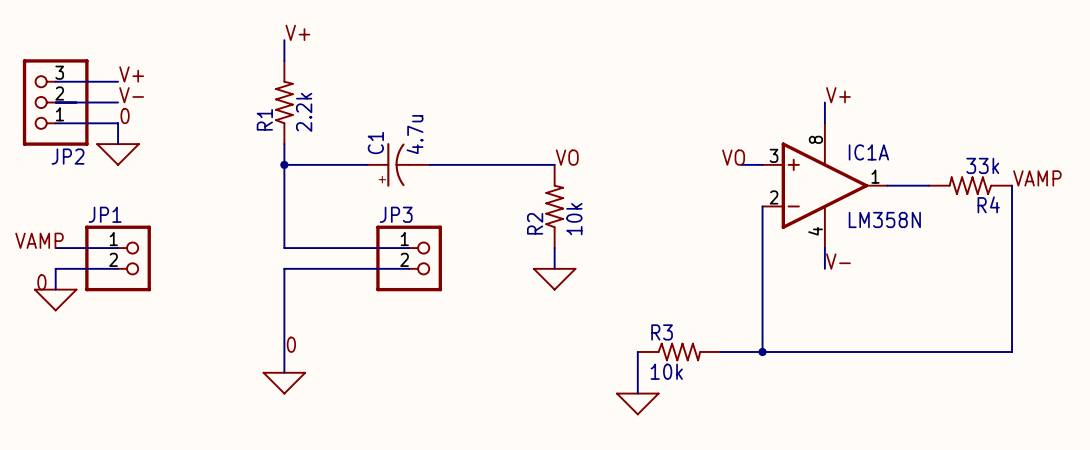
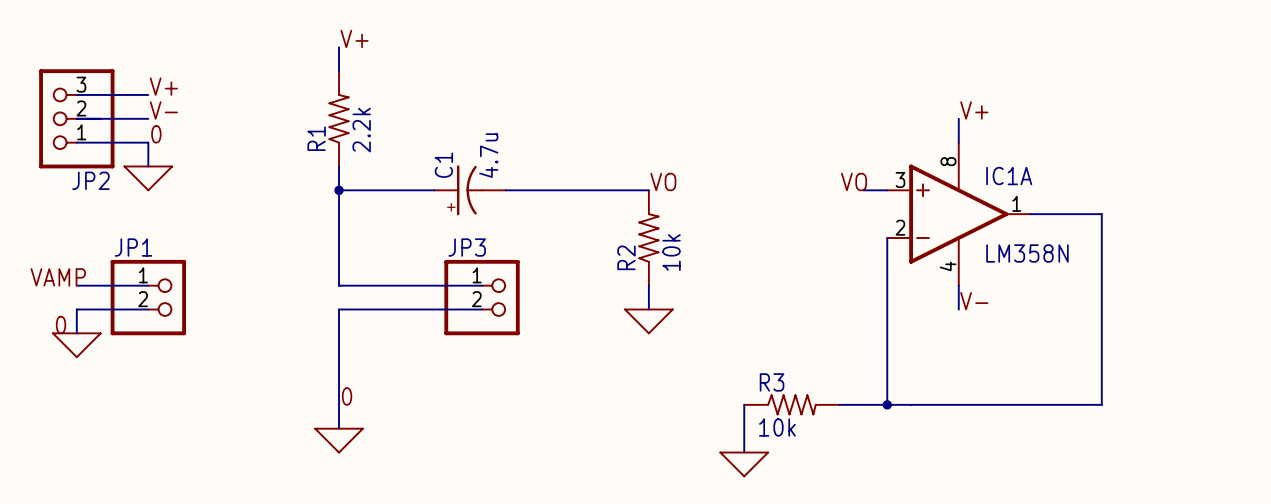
label: VAMP (1037, 178) -> none
R4: 33k (970, 185) -> none
wire: (1012, 185) (1012, 351) (949, 351) -> (1077, 214) (1101, 214) (1101, 404)

